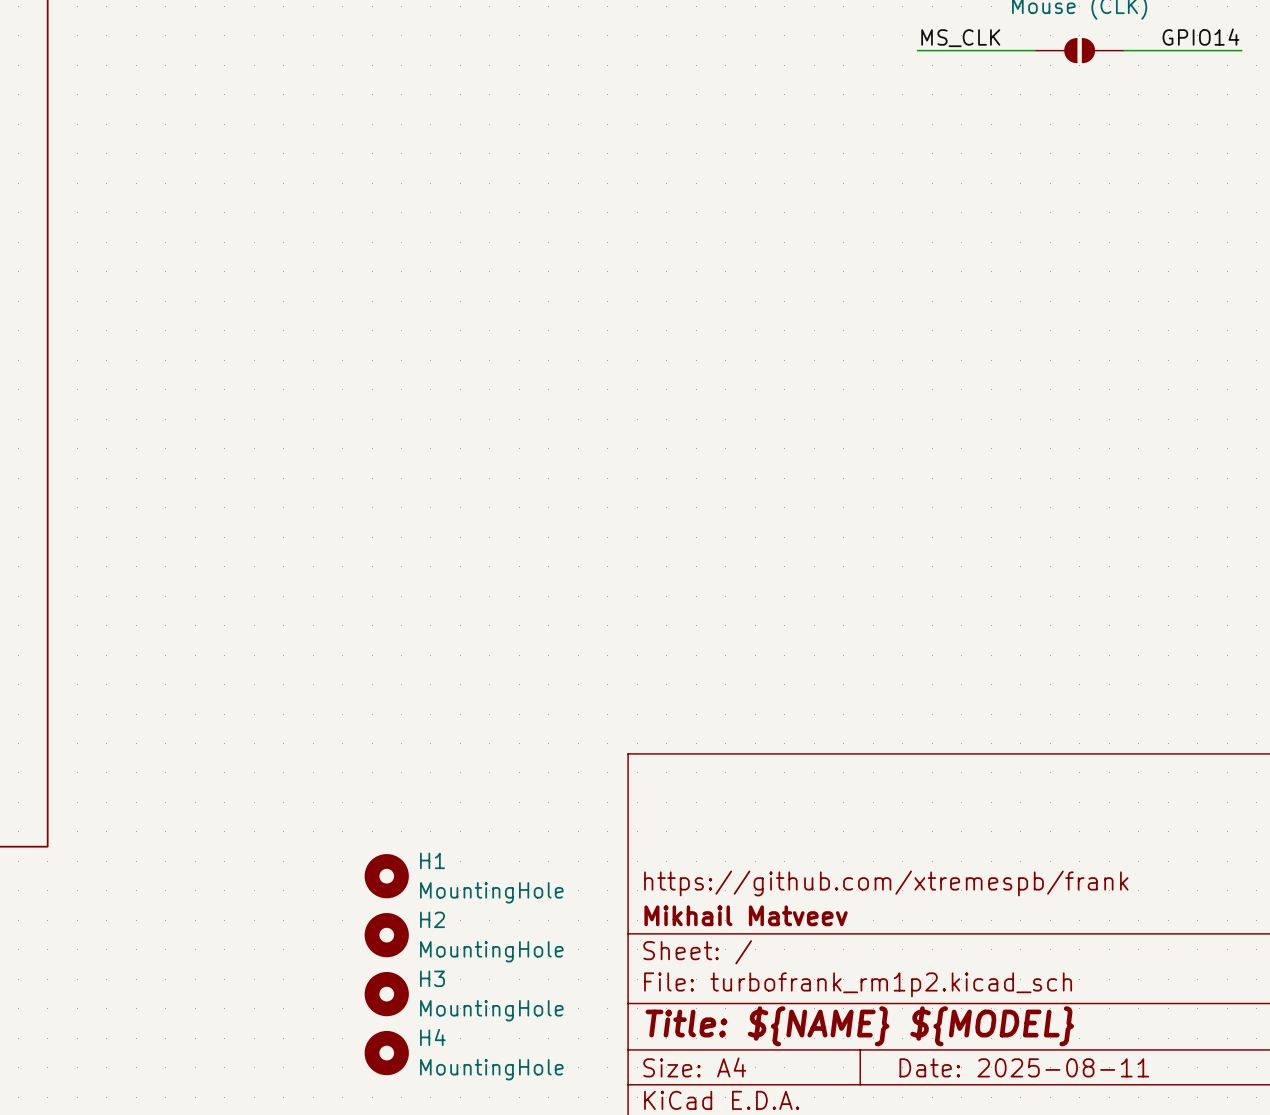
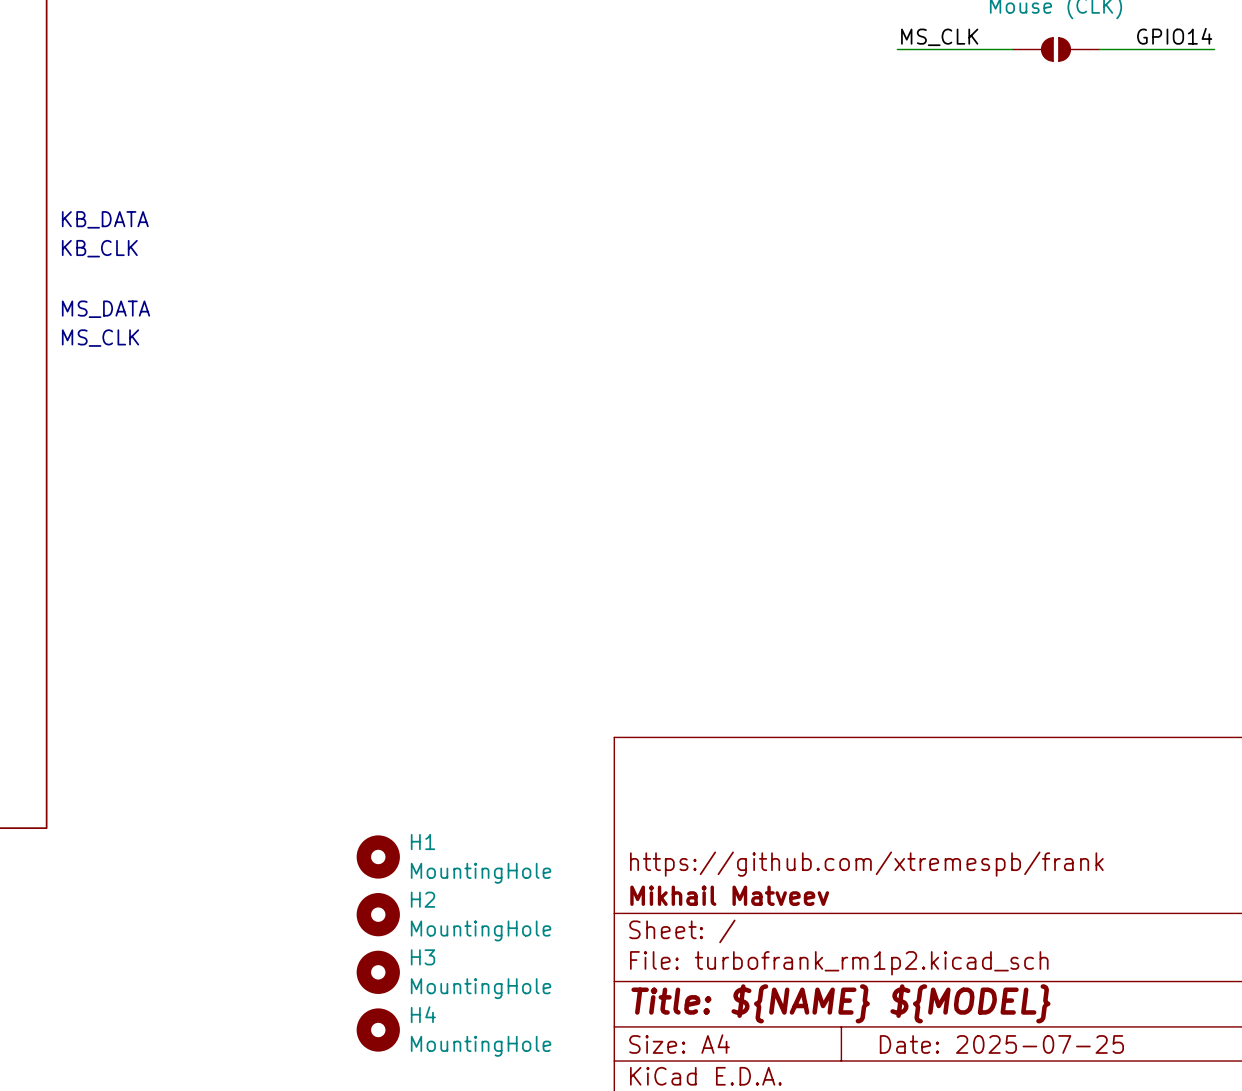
text: none -> KB_DATA (105, 219)
text: none -> KB_CLK (99, 248)
text: none -> MS_DATA (106, 309)
text: none -> MS_CLK (100, 338)
title block: Date: 2025-08-11 (1024, 1067) -> Date: 2025-07-25 (1001, 1044)

